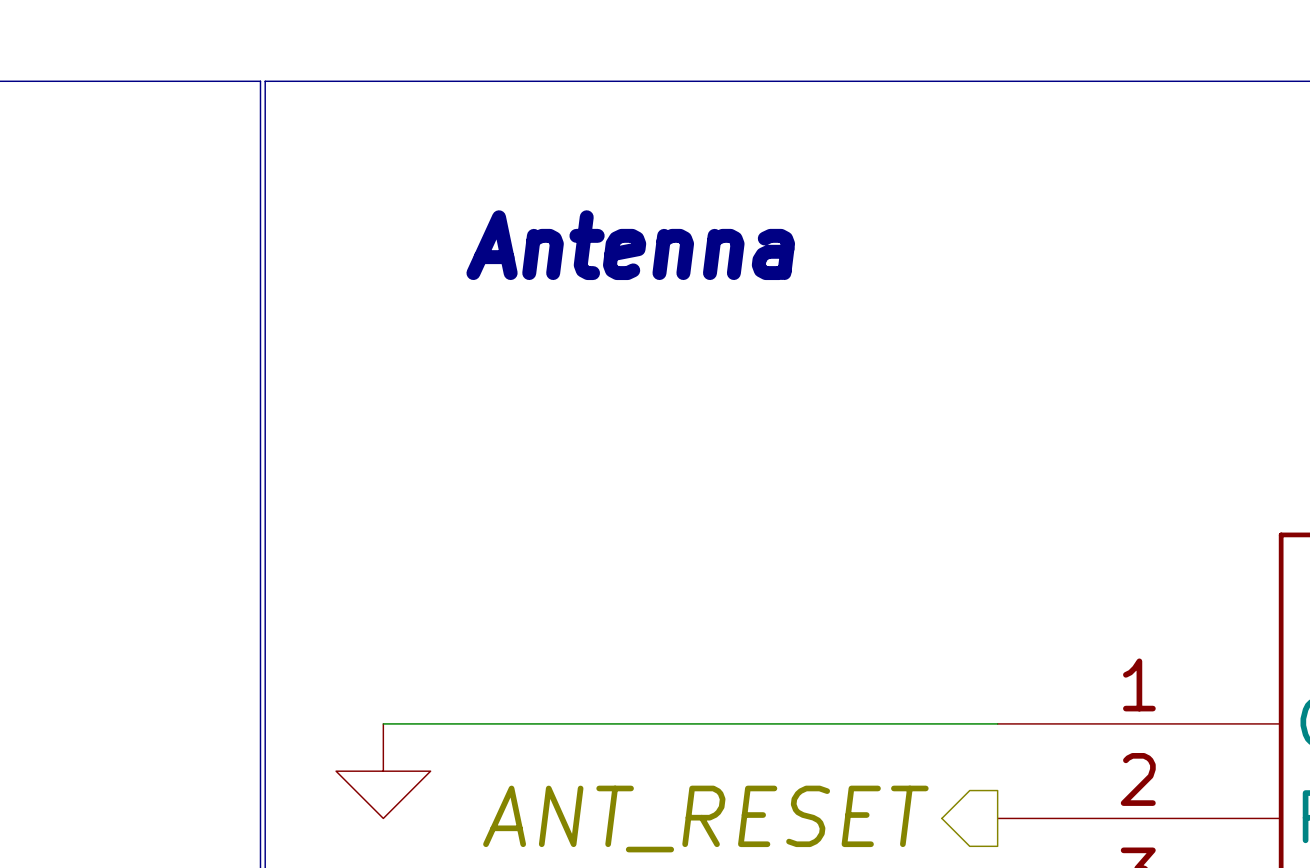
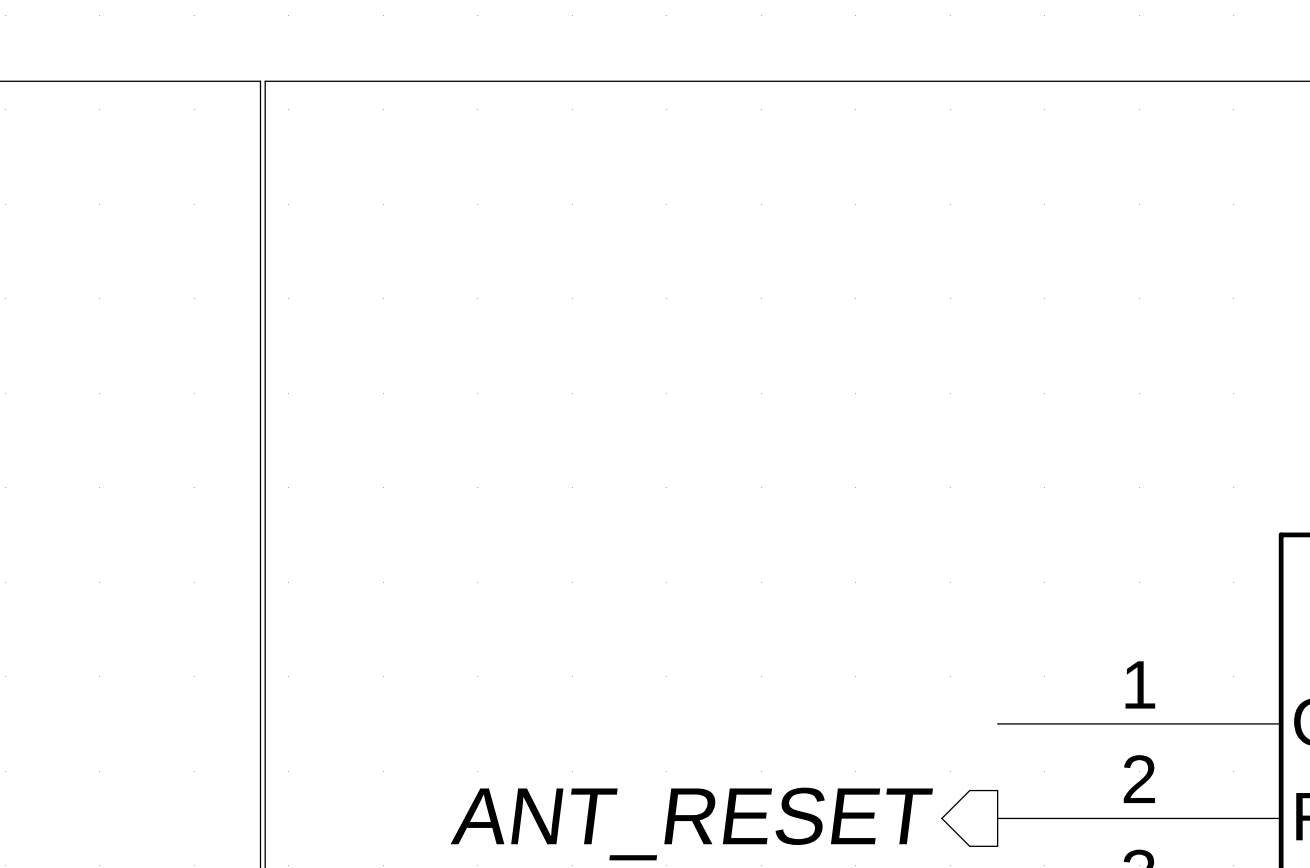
text: Antenna (630, 245) -> none
wire: (383, 723) (997, 723) -> none
power symbol: (383, 771) -> none

